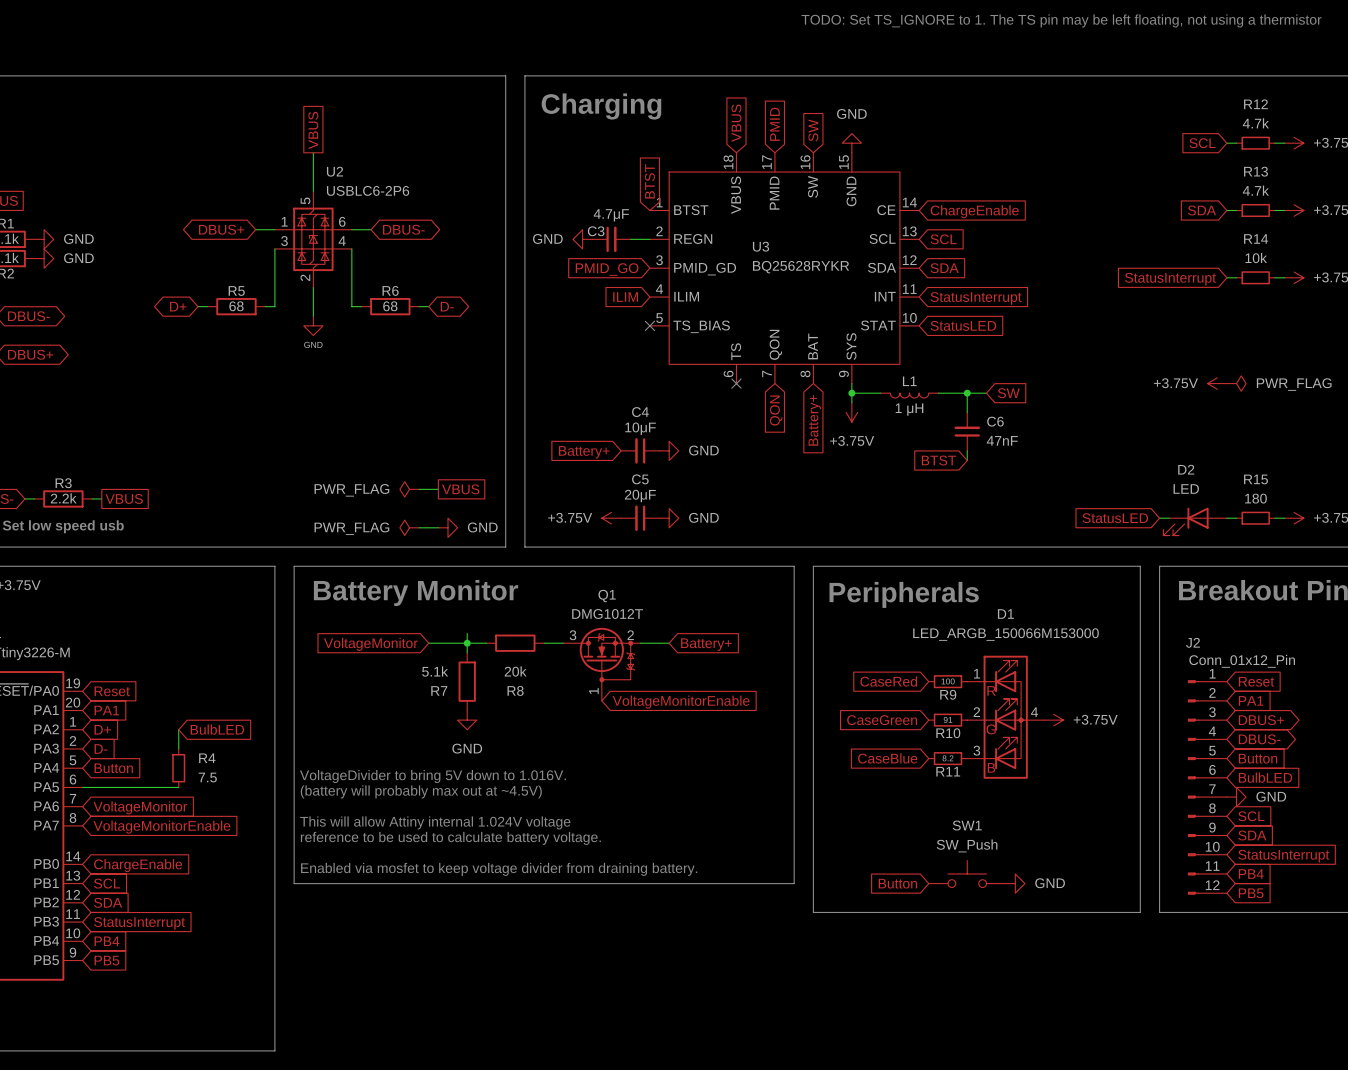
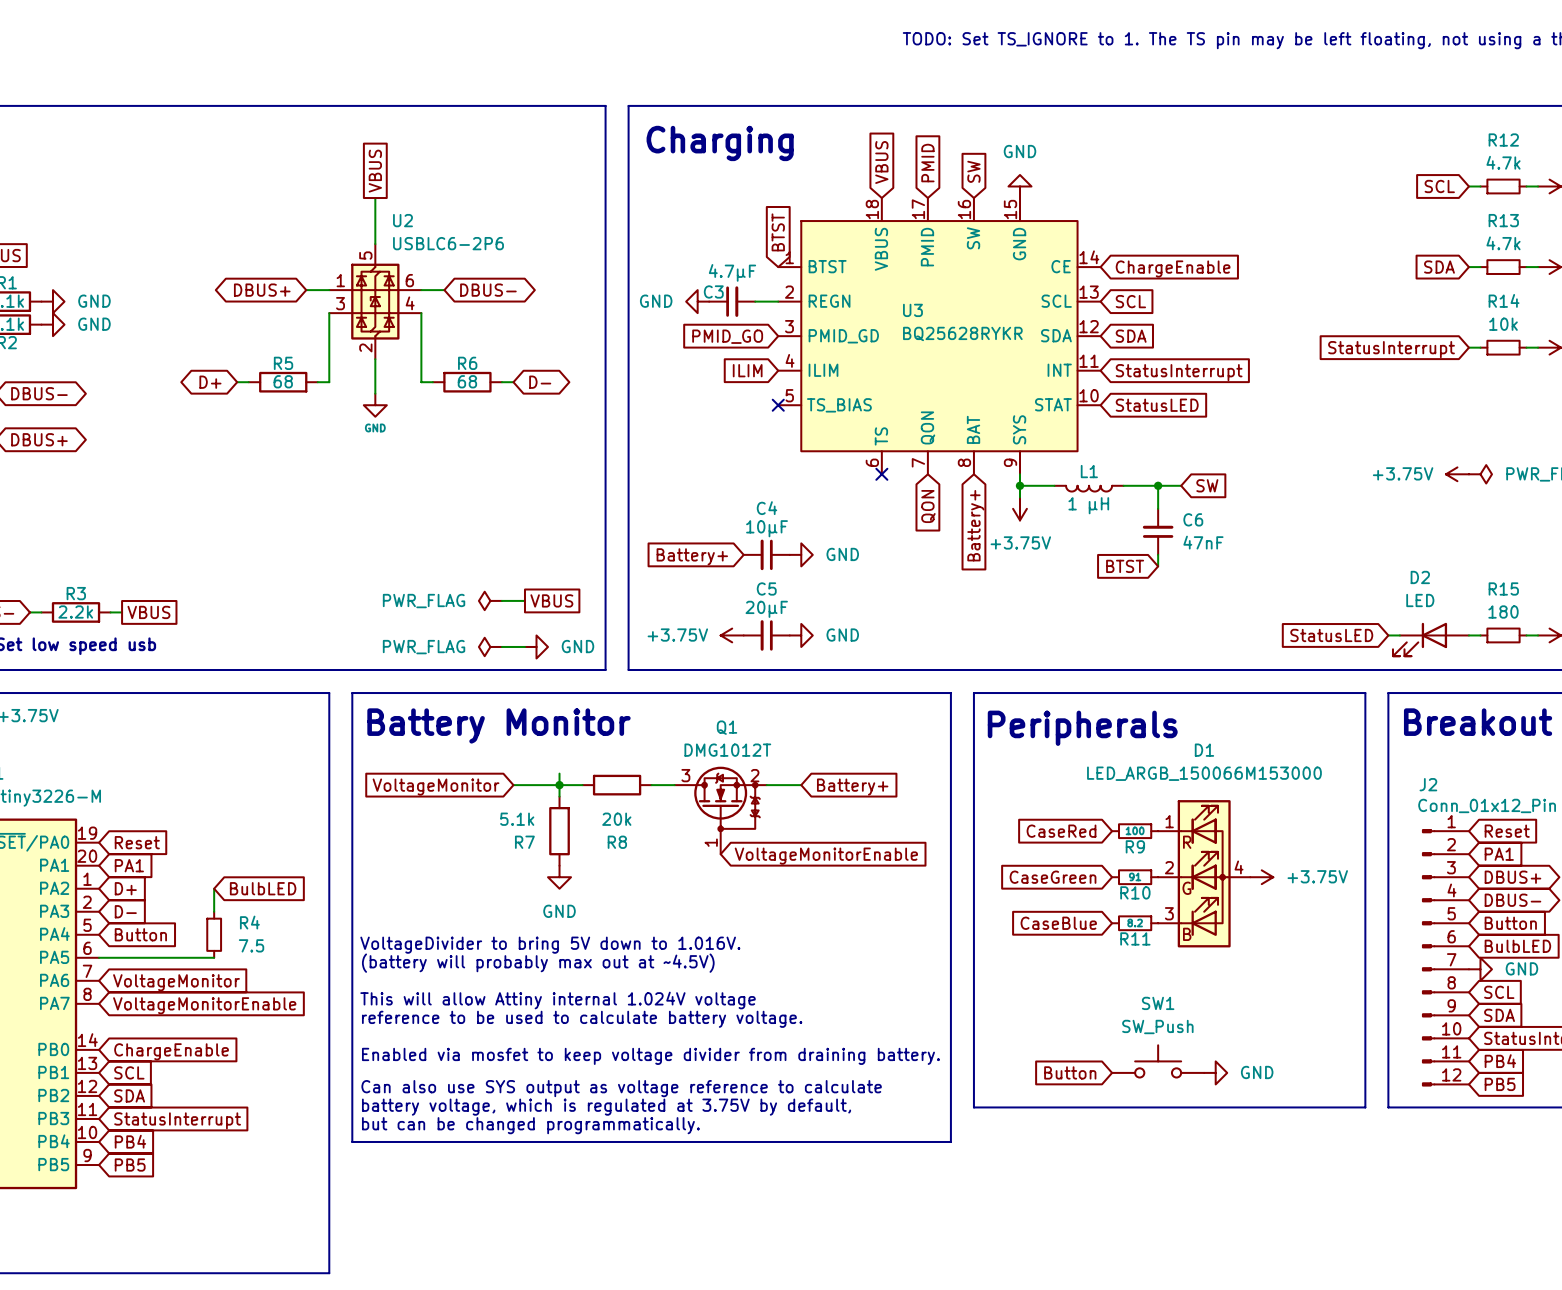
line: (294, 883) (794, 883) -> (352, 1072) (352, 1141) (950, 1141) (950, 1072)
text: none -> Can also use SYS output as voltage reference to calculate (621, 1088)
text: none -> battery voltage, which is regulated at 3.75V by default, (606, 1107)
text: none -> but can be changed programmatically. (530, 1125)

